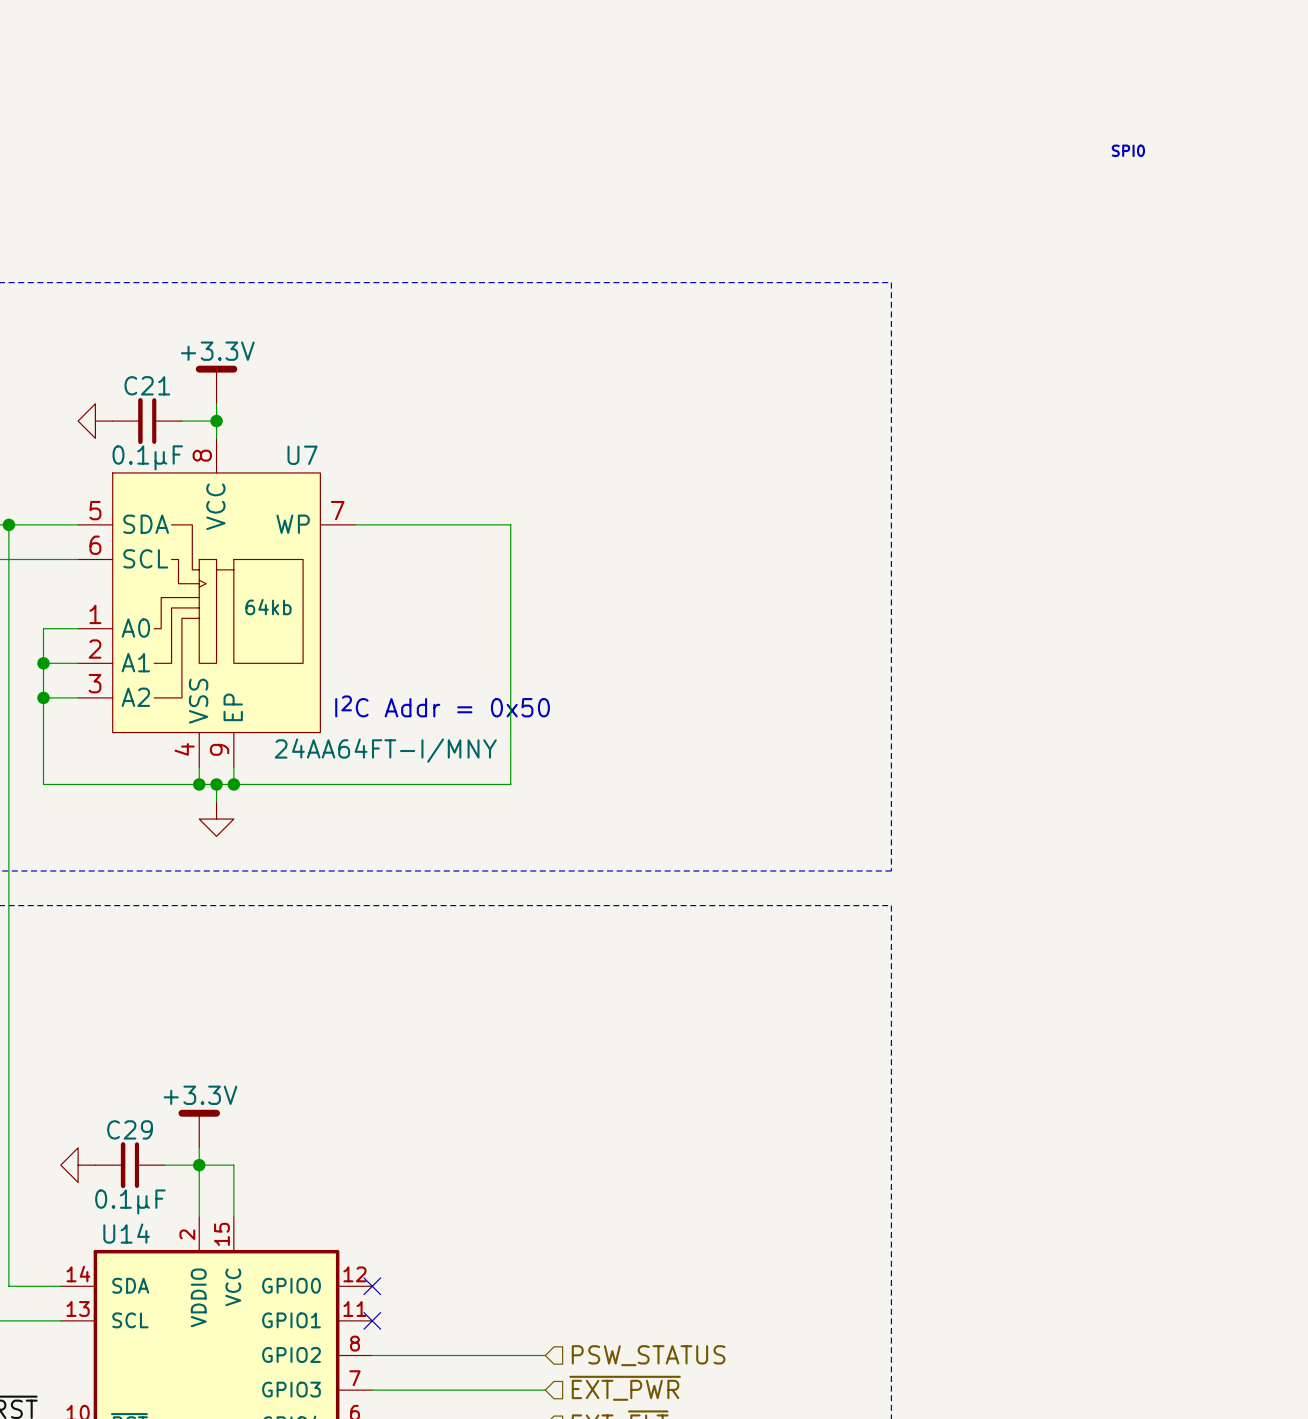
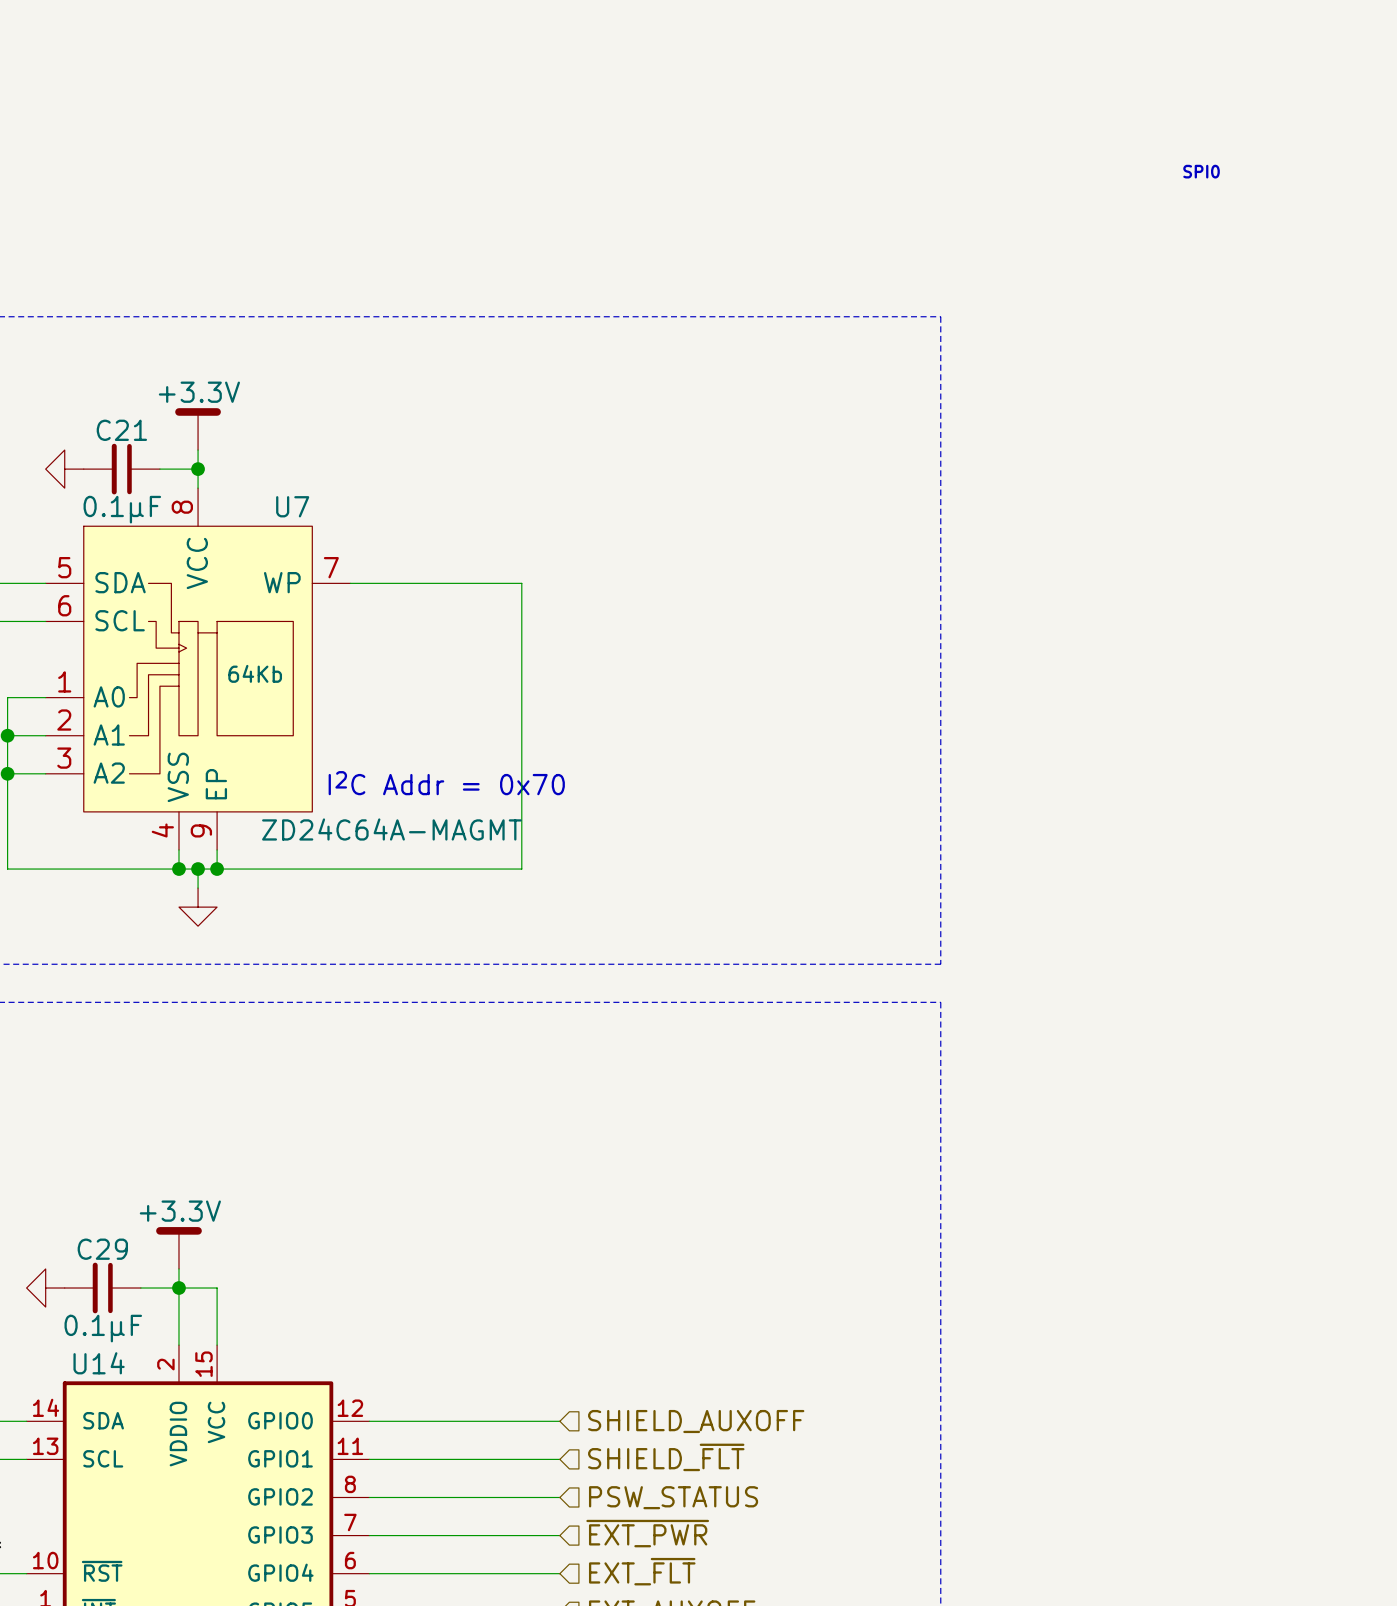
U7 text: 64kb (268, 607) -> 64Kb (255, 673)
text: I2C Addr = 0x50 (442, 706) -> I2C Addr = 0x70 (446, 783)
U7 value: 24AA64FT-I/MNY (385, 750) -> ZD24C64A-MAGMT (391, 829)
wire: none -> (369, 1421) (559, 1421)
no-connect mark: (372, 1286) -> none
hierarchical label: none -> SHIELD_AUXOFF (696, 1421)
hierarchical label: none -> SHIELD_~{FLT} (666, 1457)
wire: none -> (369, 1459) (559, 1459)
no-connect mark: (372, 1320) -> none

